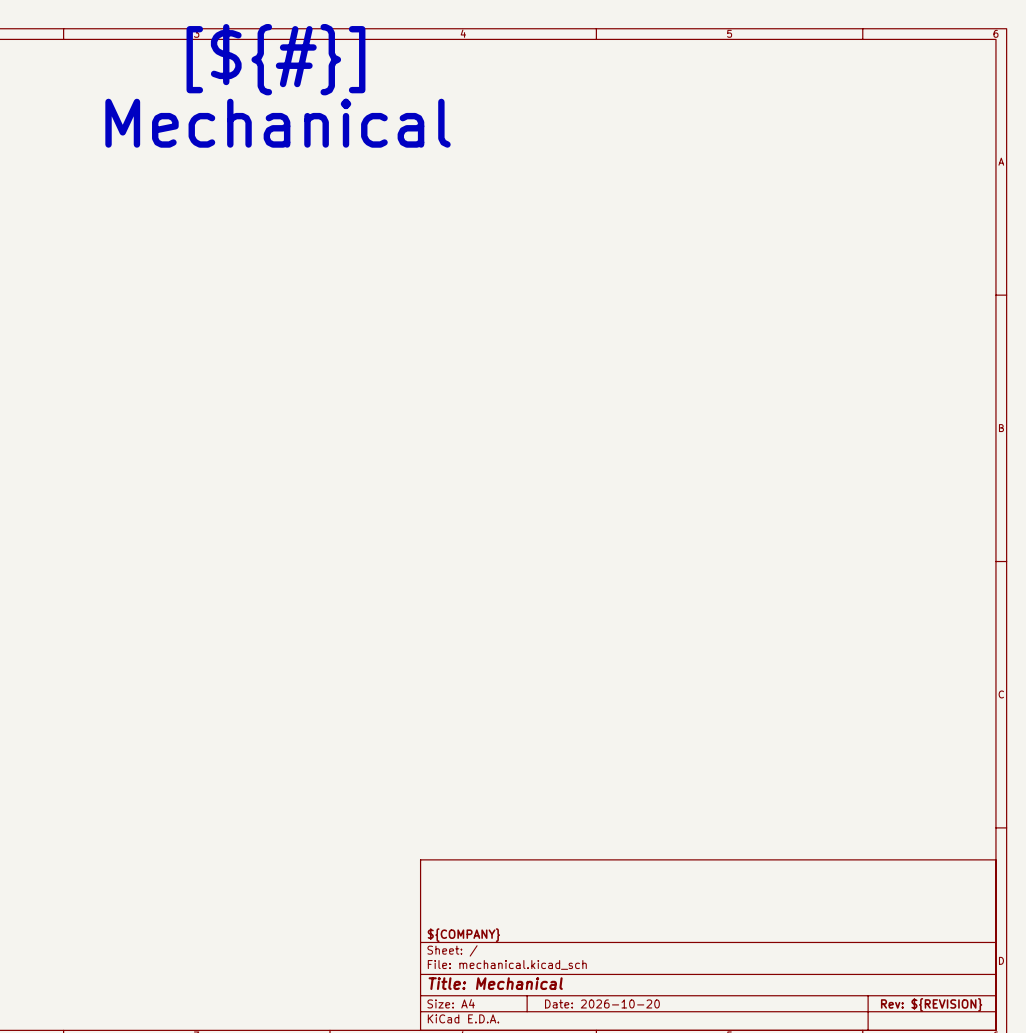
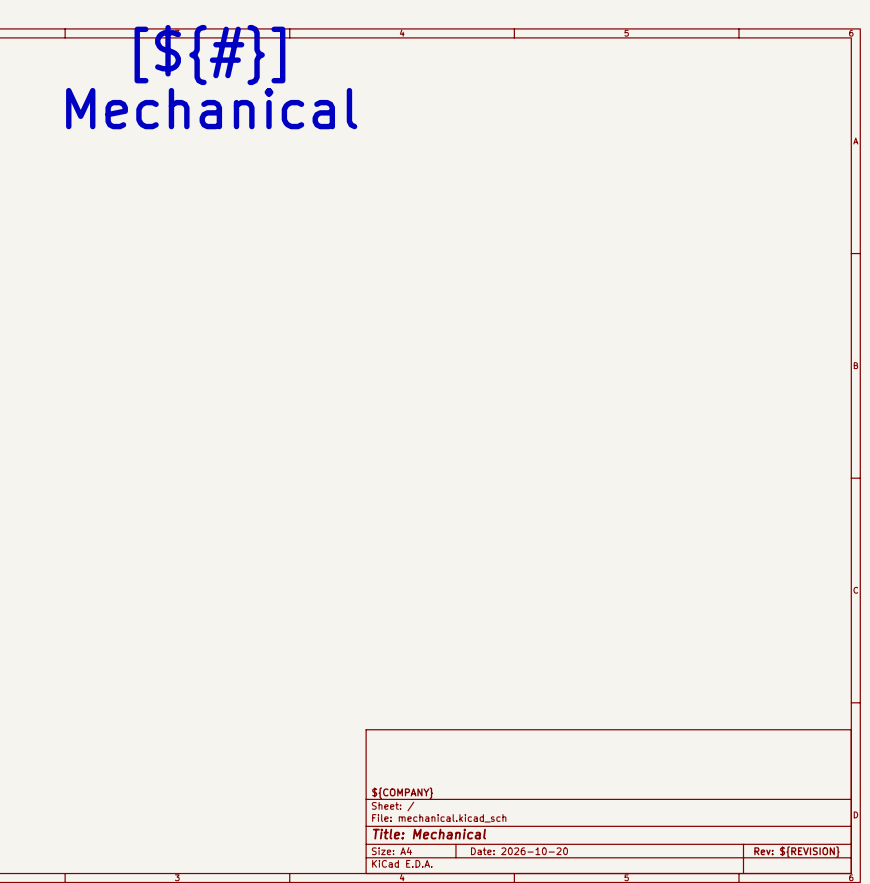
text position: [${#}] (275, 59) -> [${#}] (209, 55)
text position: Mechanical (278, 123) -> Mechanical (211, 108)

